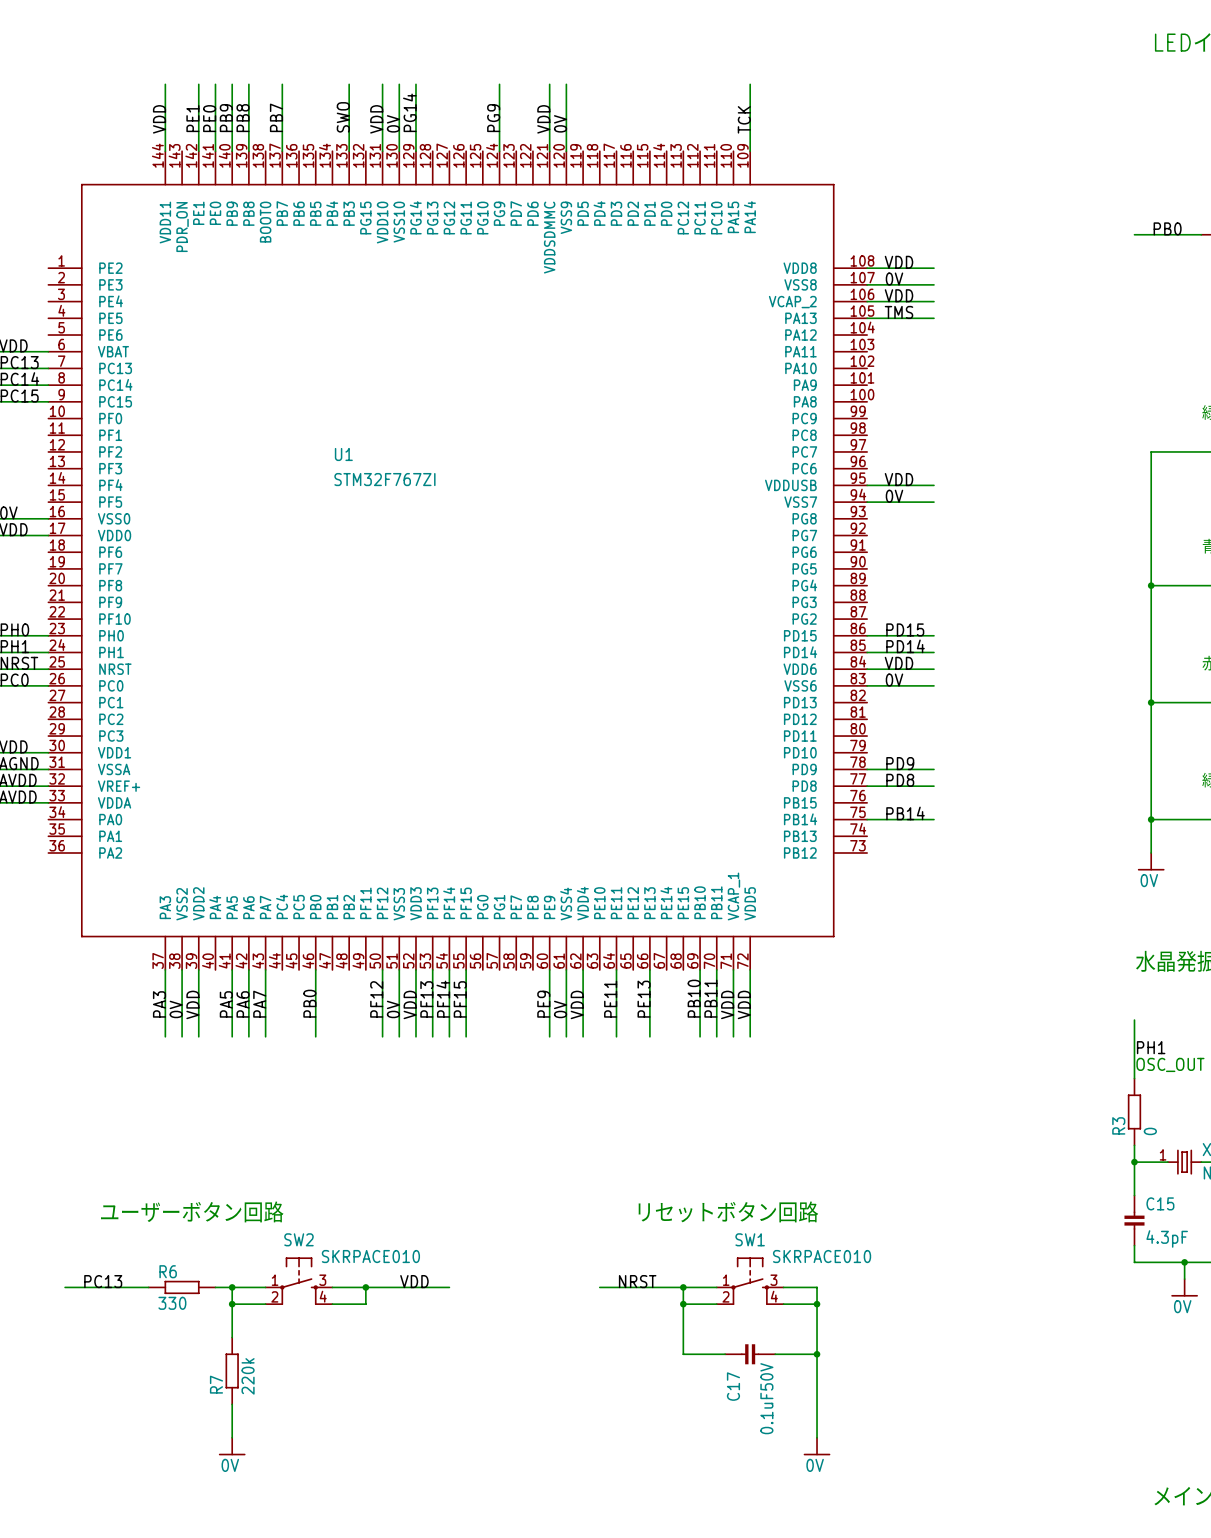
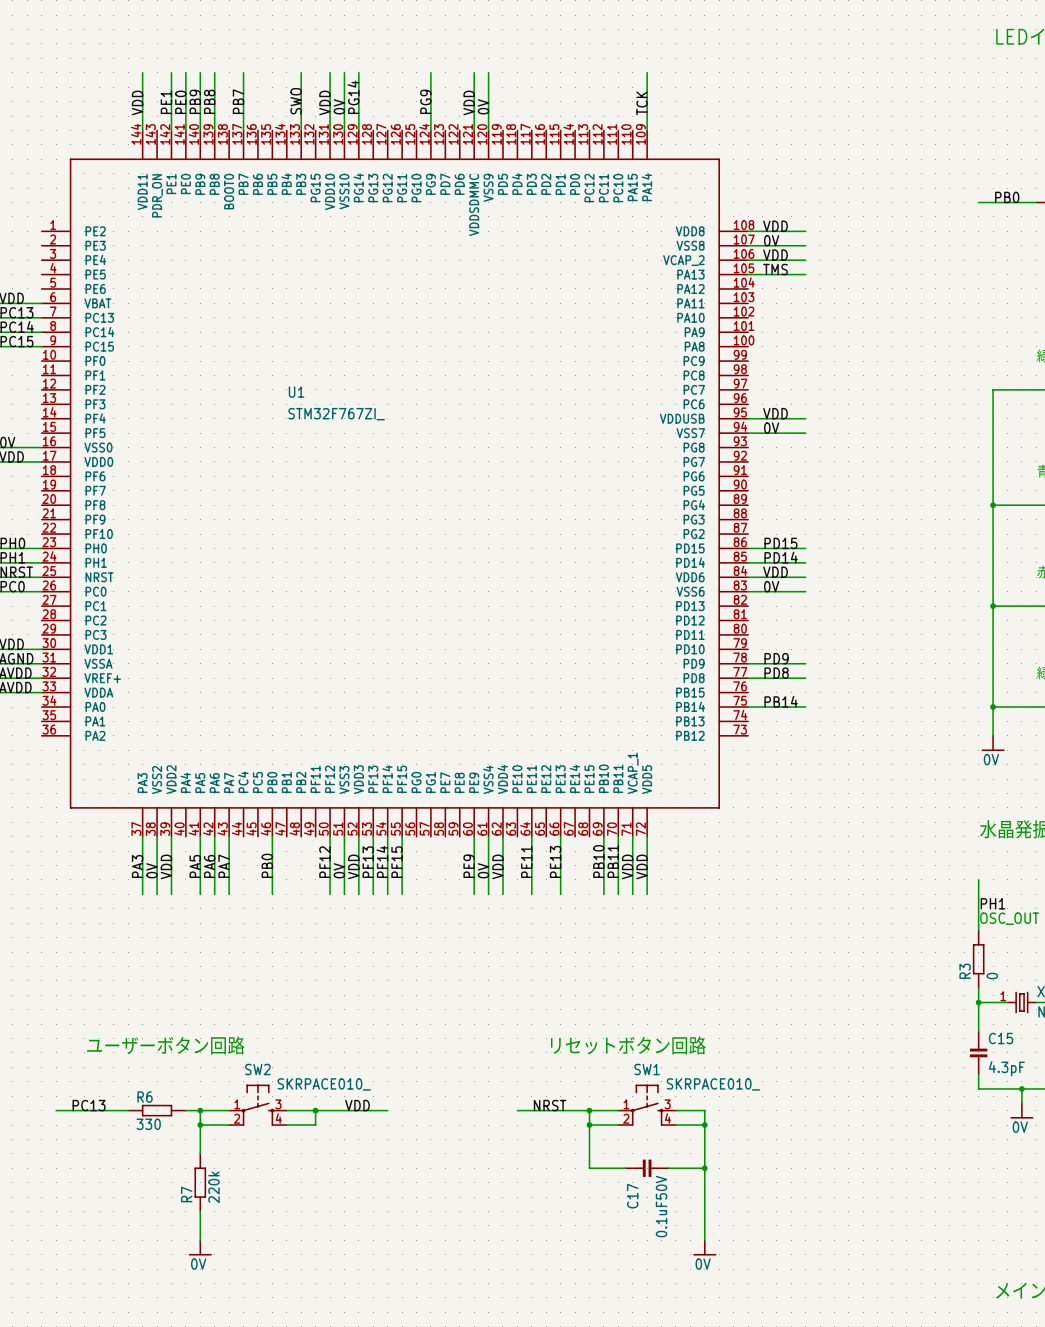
U1 value: STM32F767ZI (384, 479) -> STM32F767ZI_ (336, 414)
SW2 value: SKRPACE010 (370, 1256) -> SKRPACE010_ (324, 1084)
SW1 value: SKRPACE010 (822, 1256) -> SKRPACE010_ (713, 1084)

